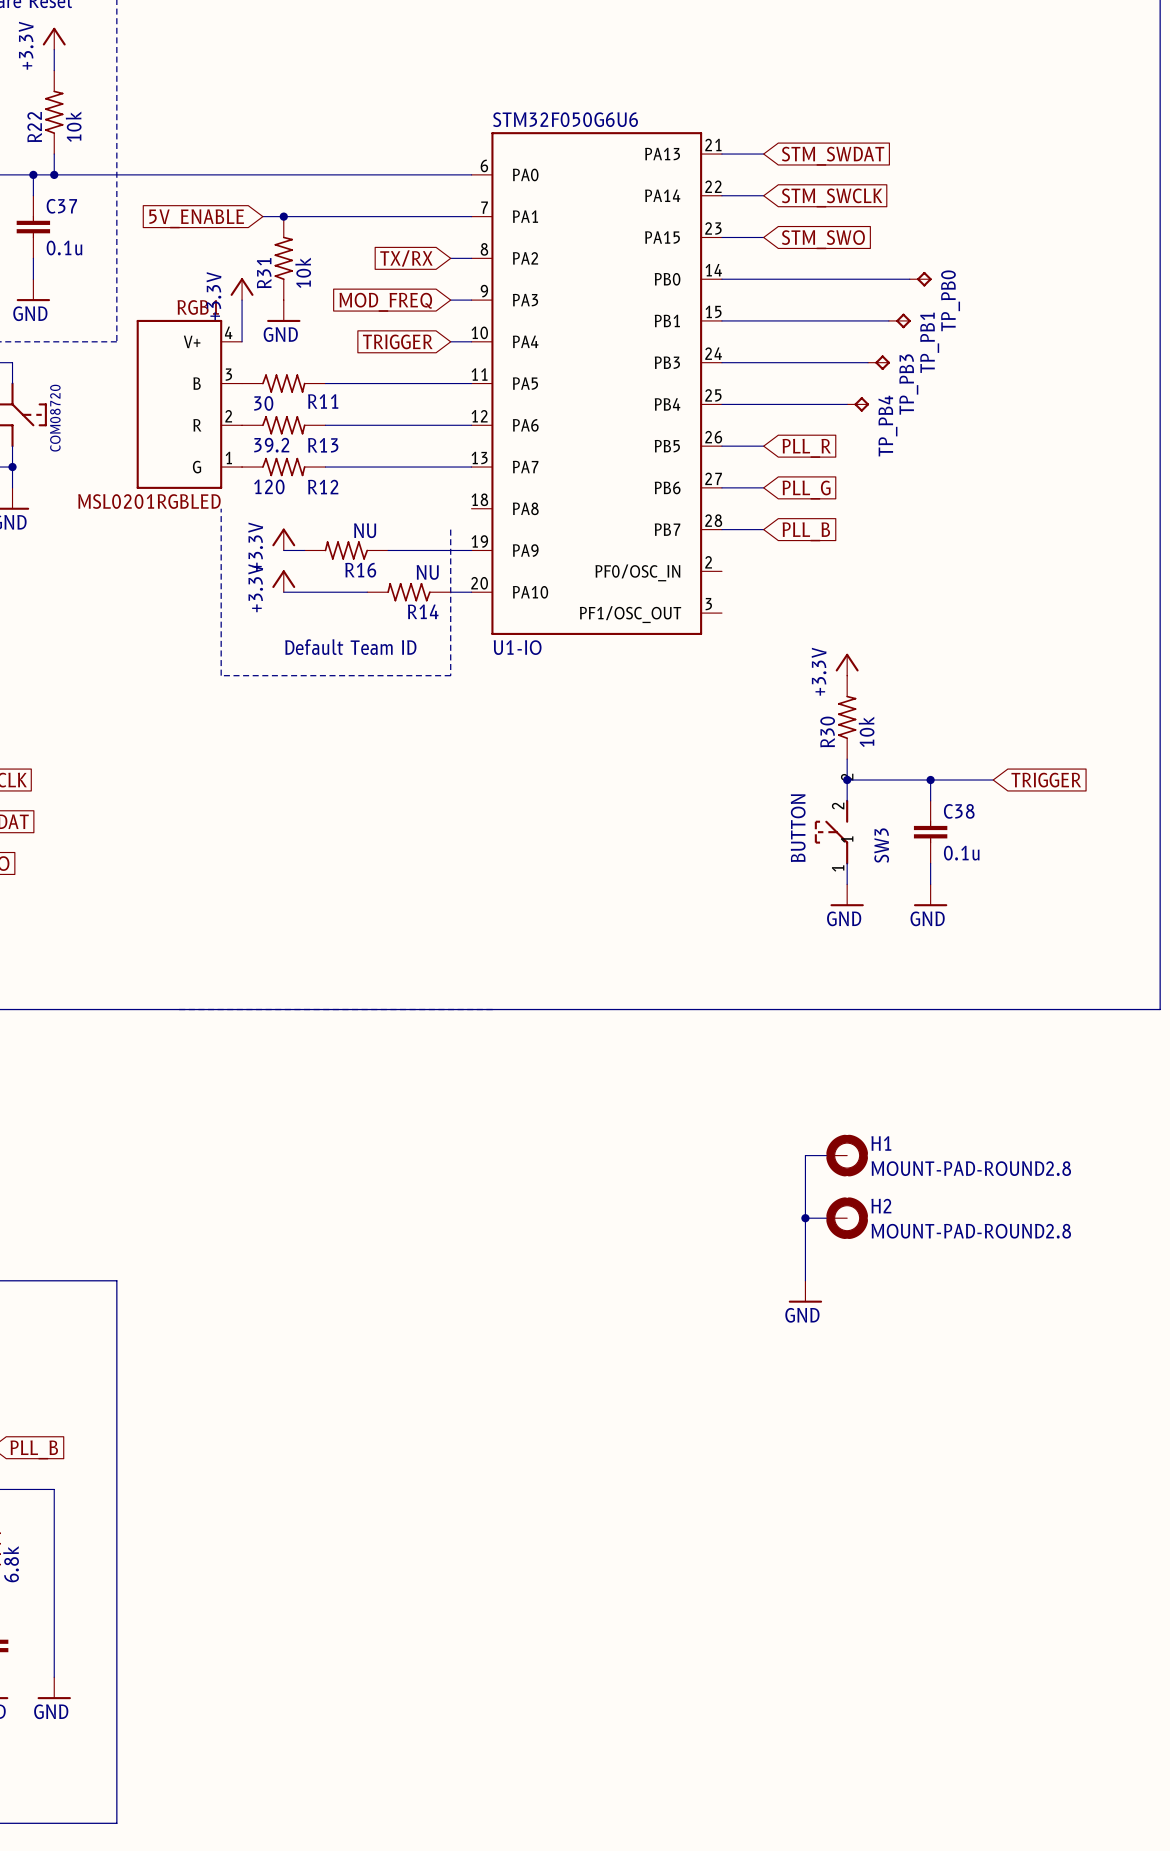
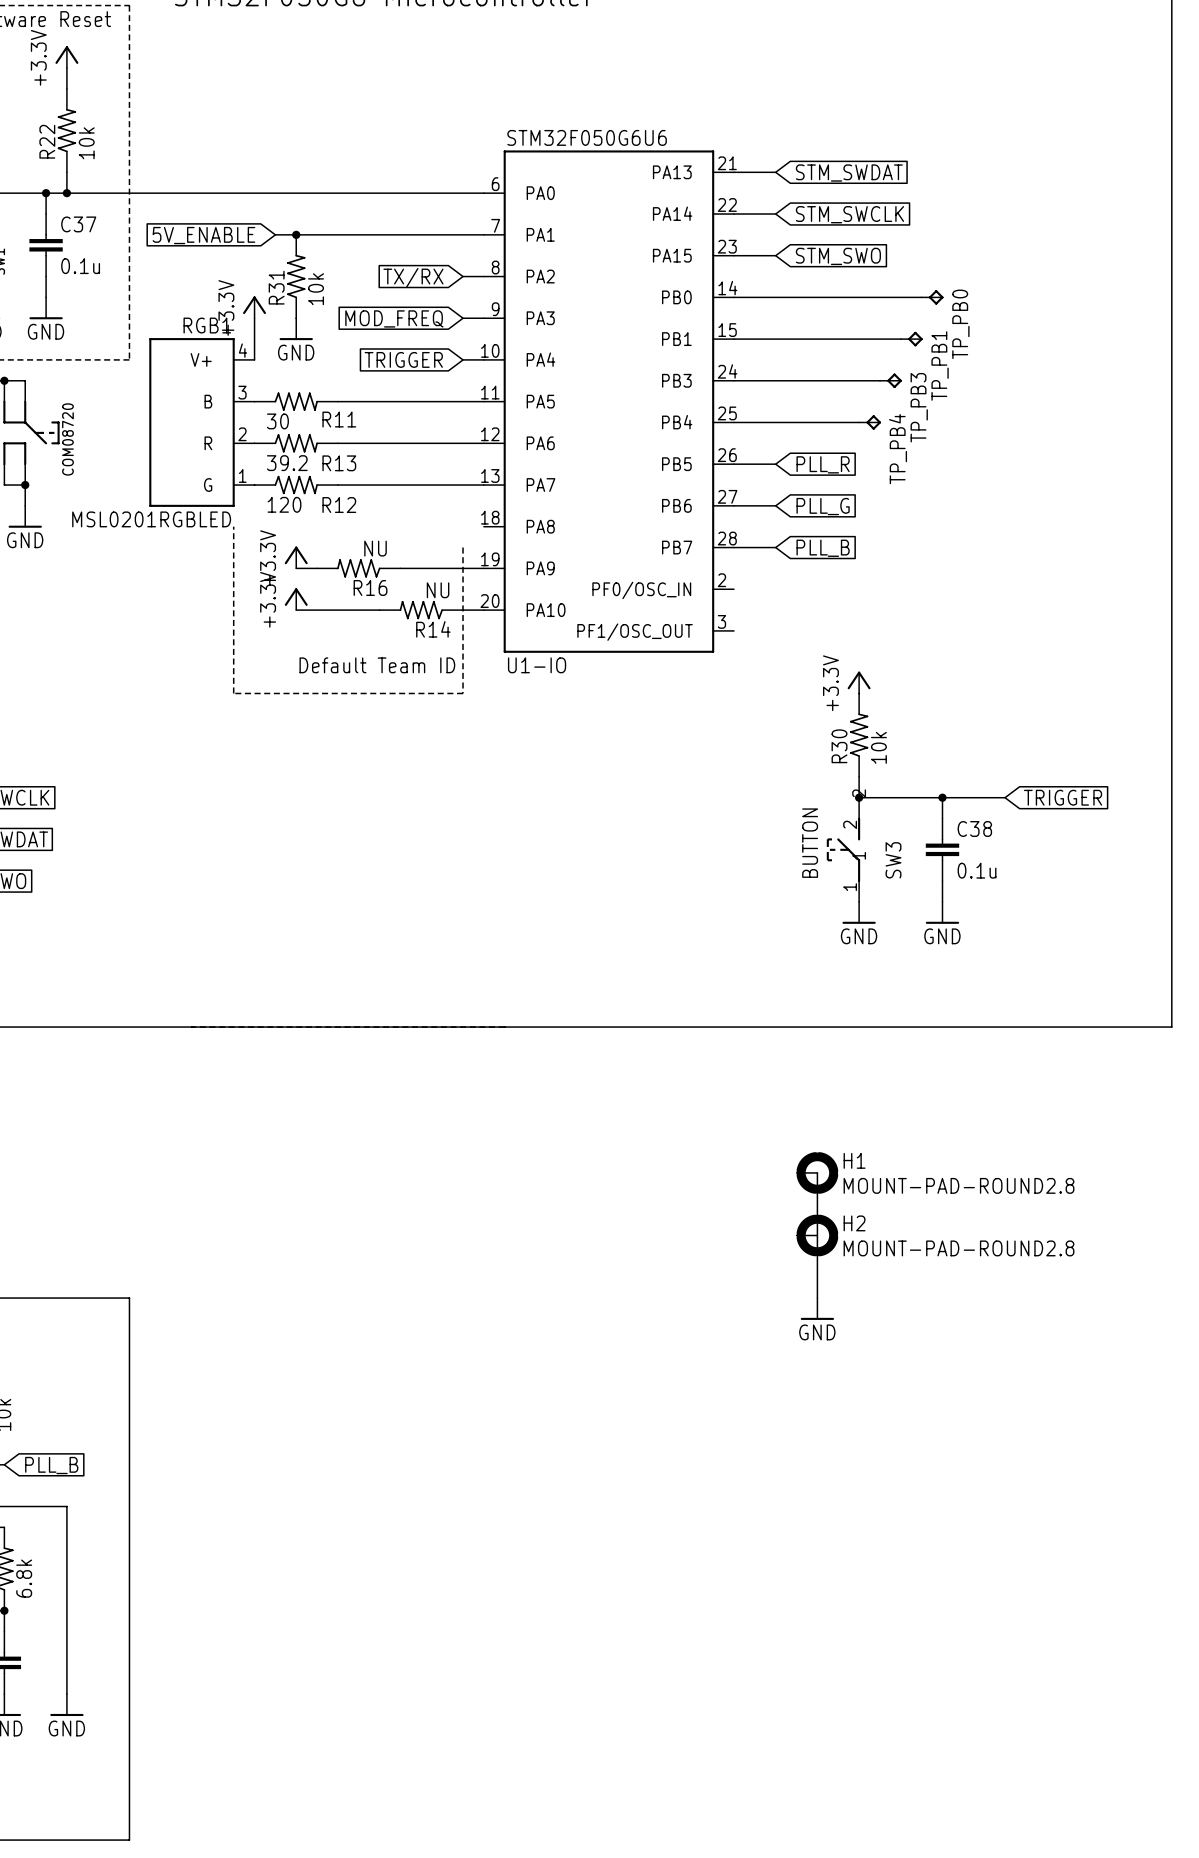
wire: (805, 1155) (826, 1155) -> none
H1 position: (847, 1155) -> (817, 1172)
wire: (805, 1218) (826, 1218) -> none
junction: (805, 1218) -> none
H2 position: (847, 1218) -> (817, 1235)

